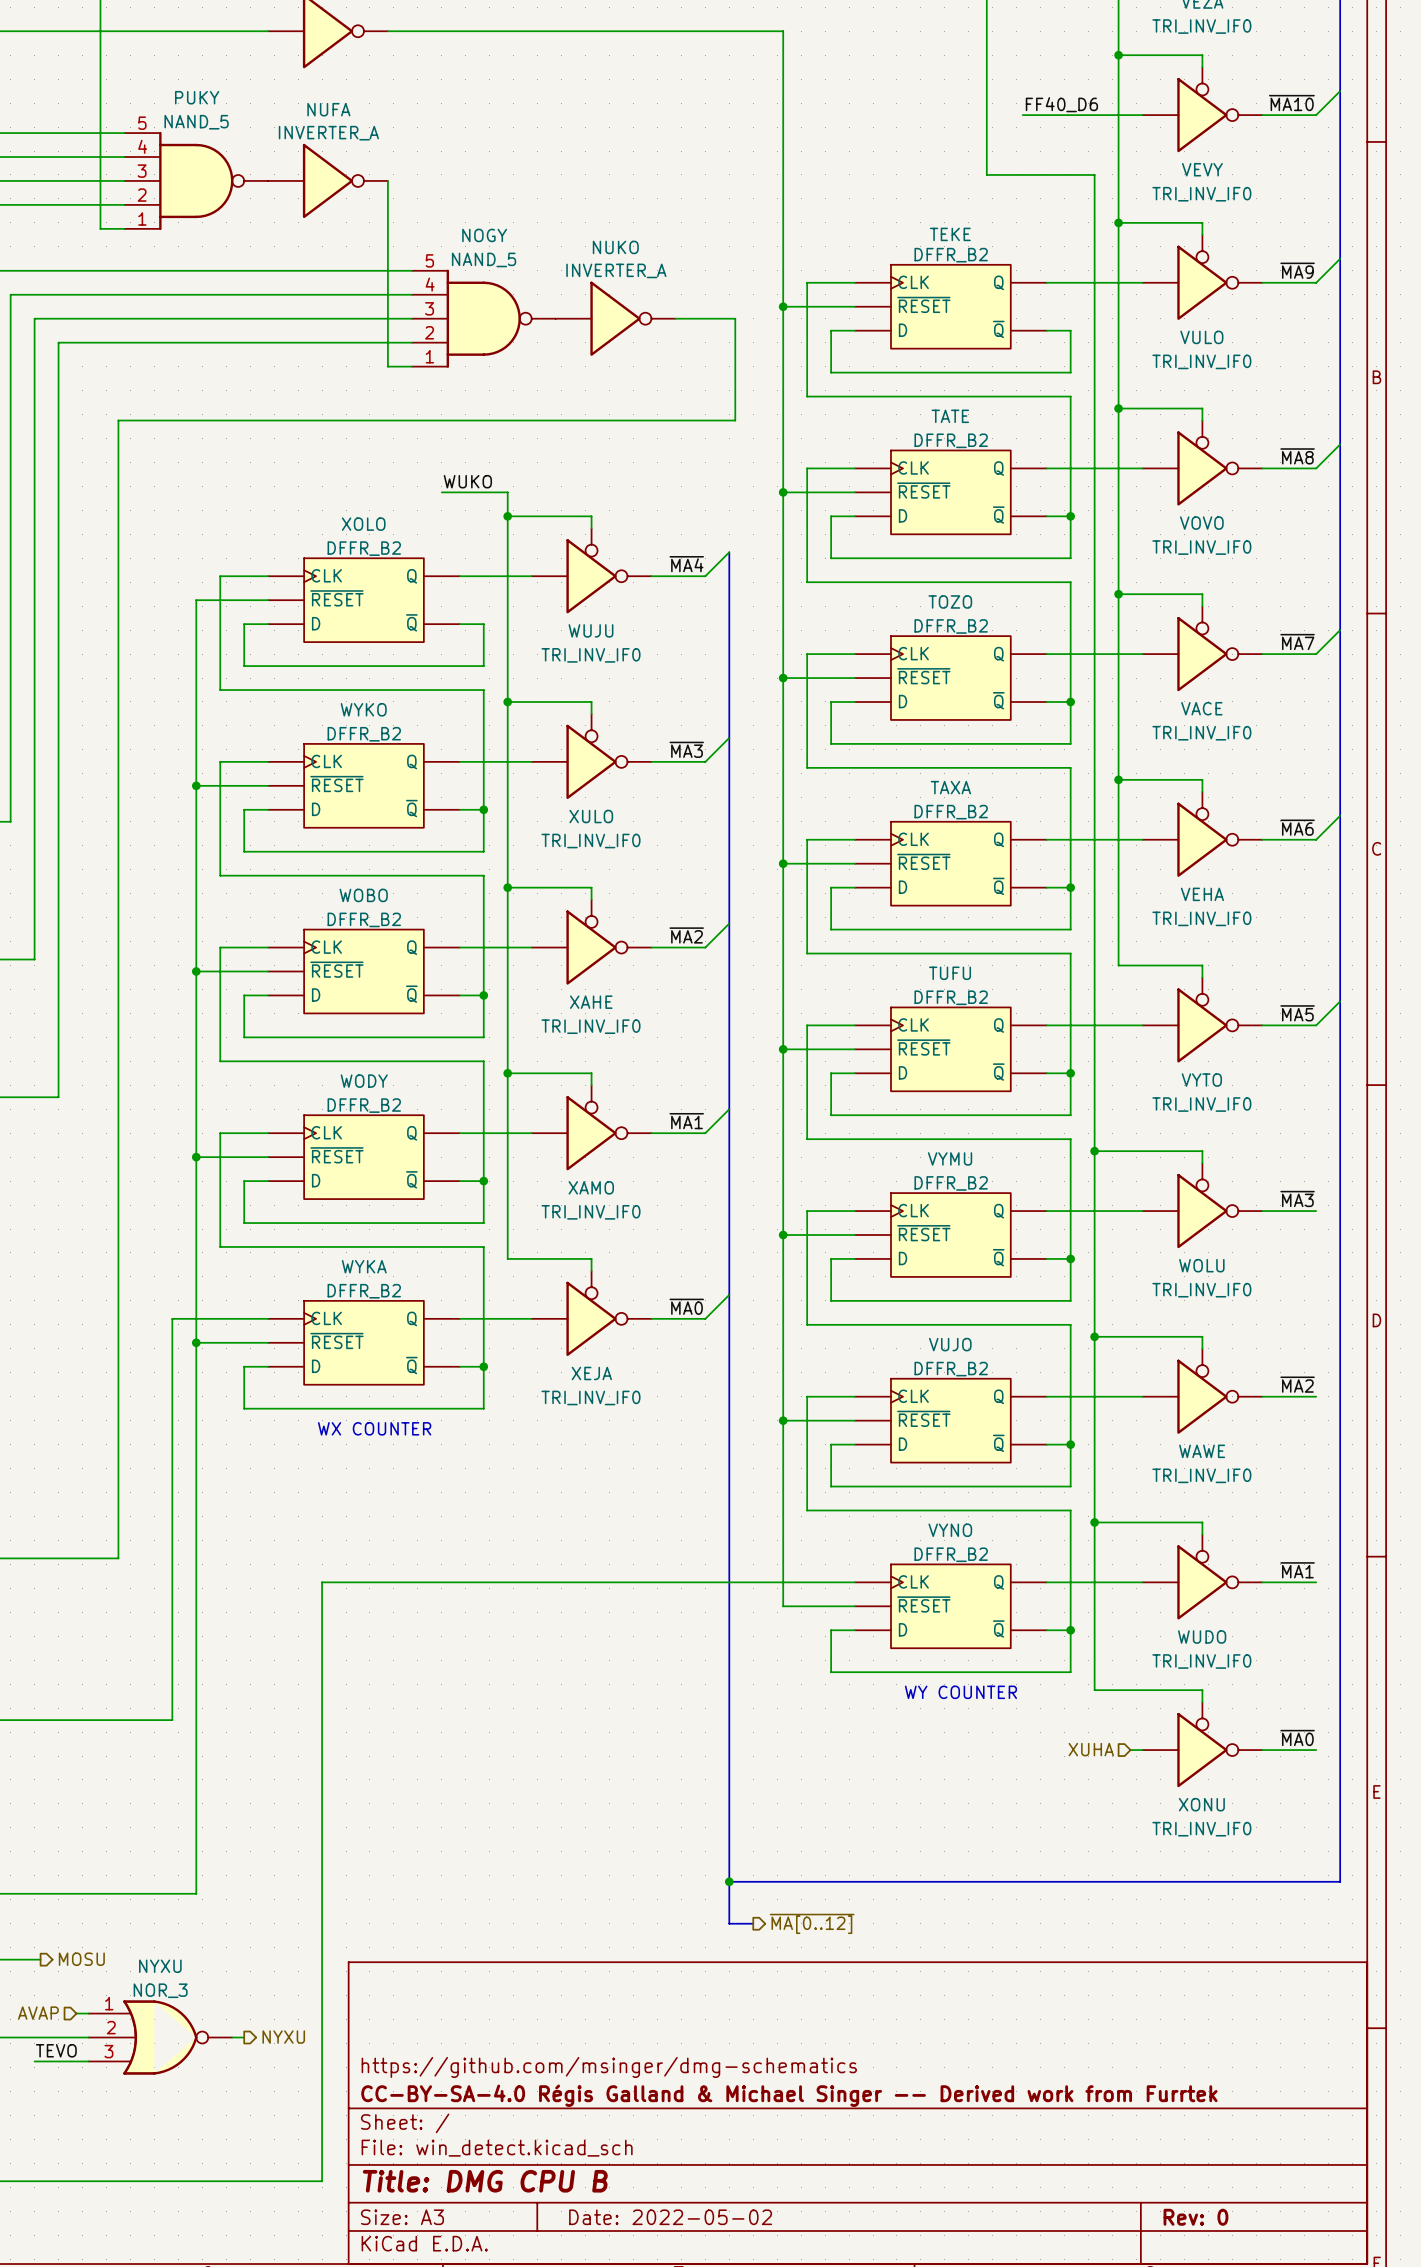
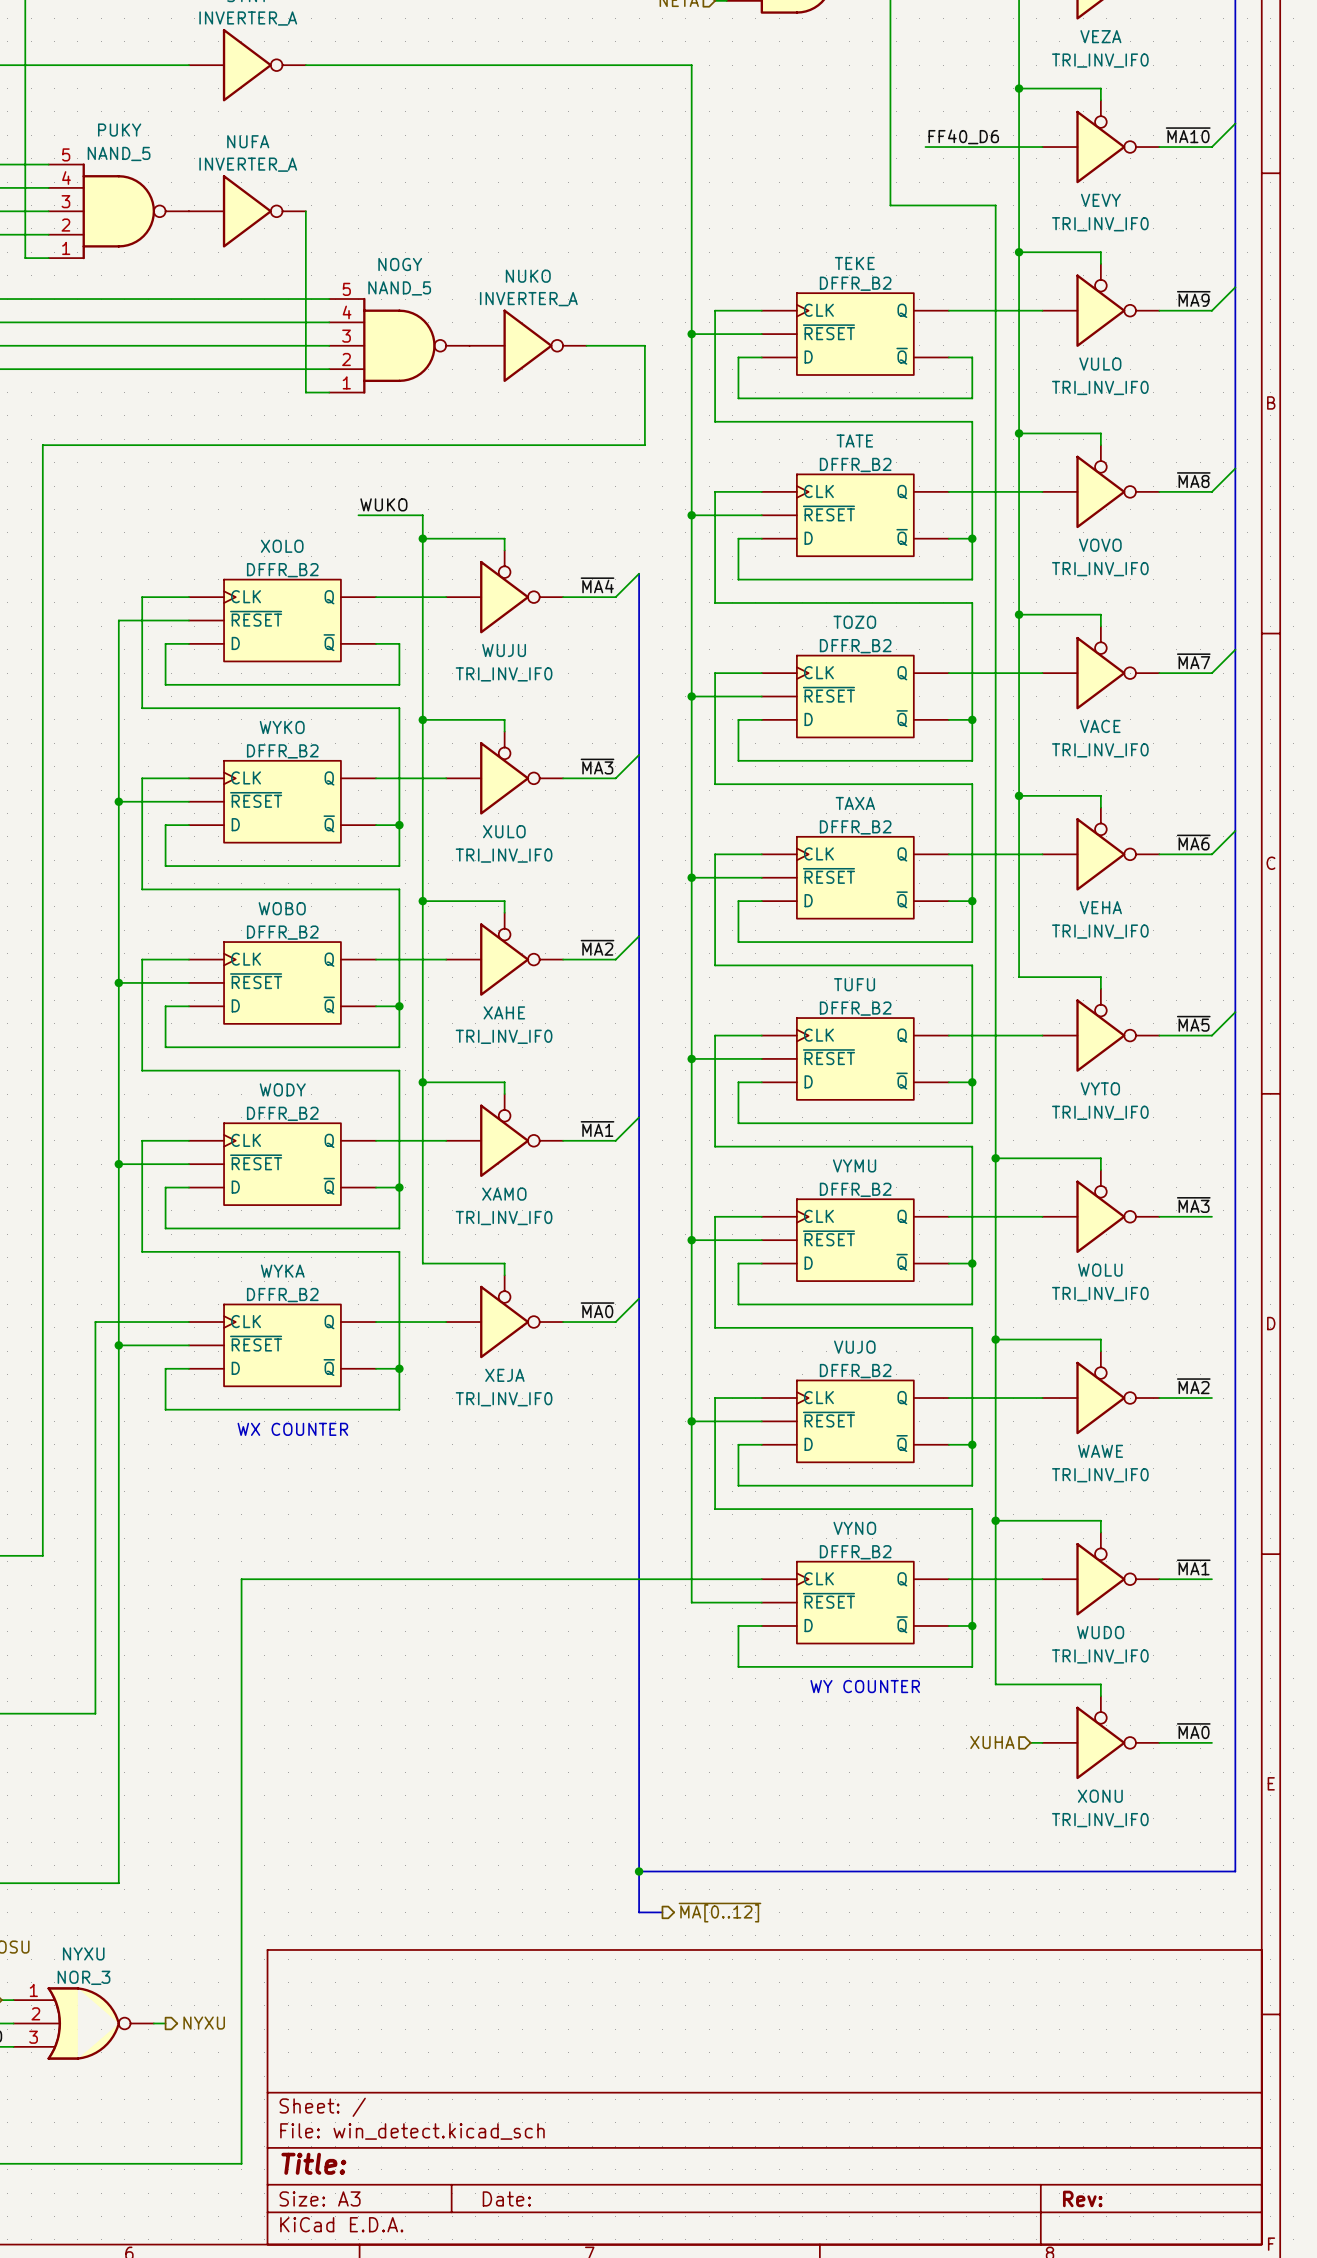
title block: https://github.com/msinger/dmg-schematics (609, 2067) -> none
title block: CC-BY-SA-4.0 Régis Galland & Michael Singer -- Derived work from Furrtek (789, 2095) -> none
title block: Title: DMG CPU B (485, 2181) -> Title: (313, 2163)
title block: Date: 2022-05-02 (670, 2217) -> Date: (506, 2198)
title block: Rev: 0 (1195, 2217) -> Rev: (1082, 2198)

